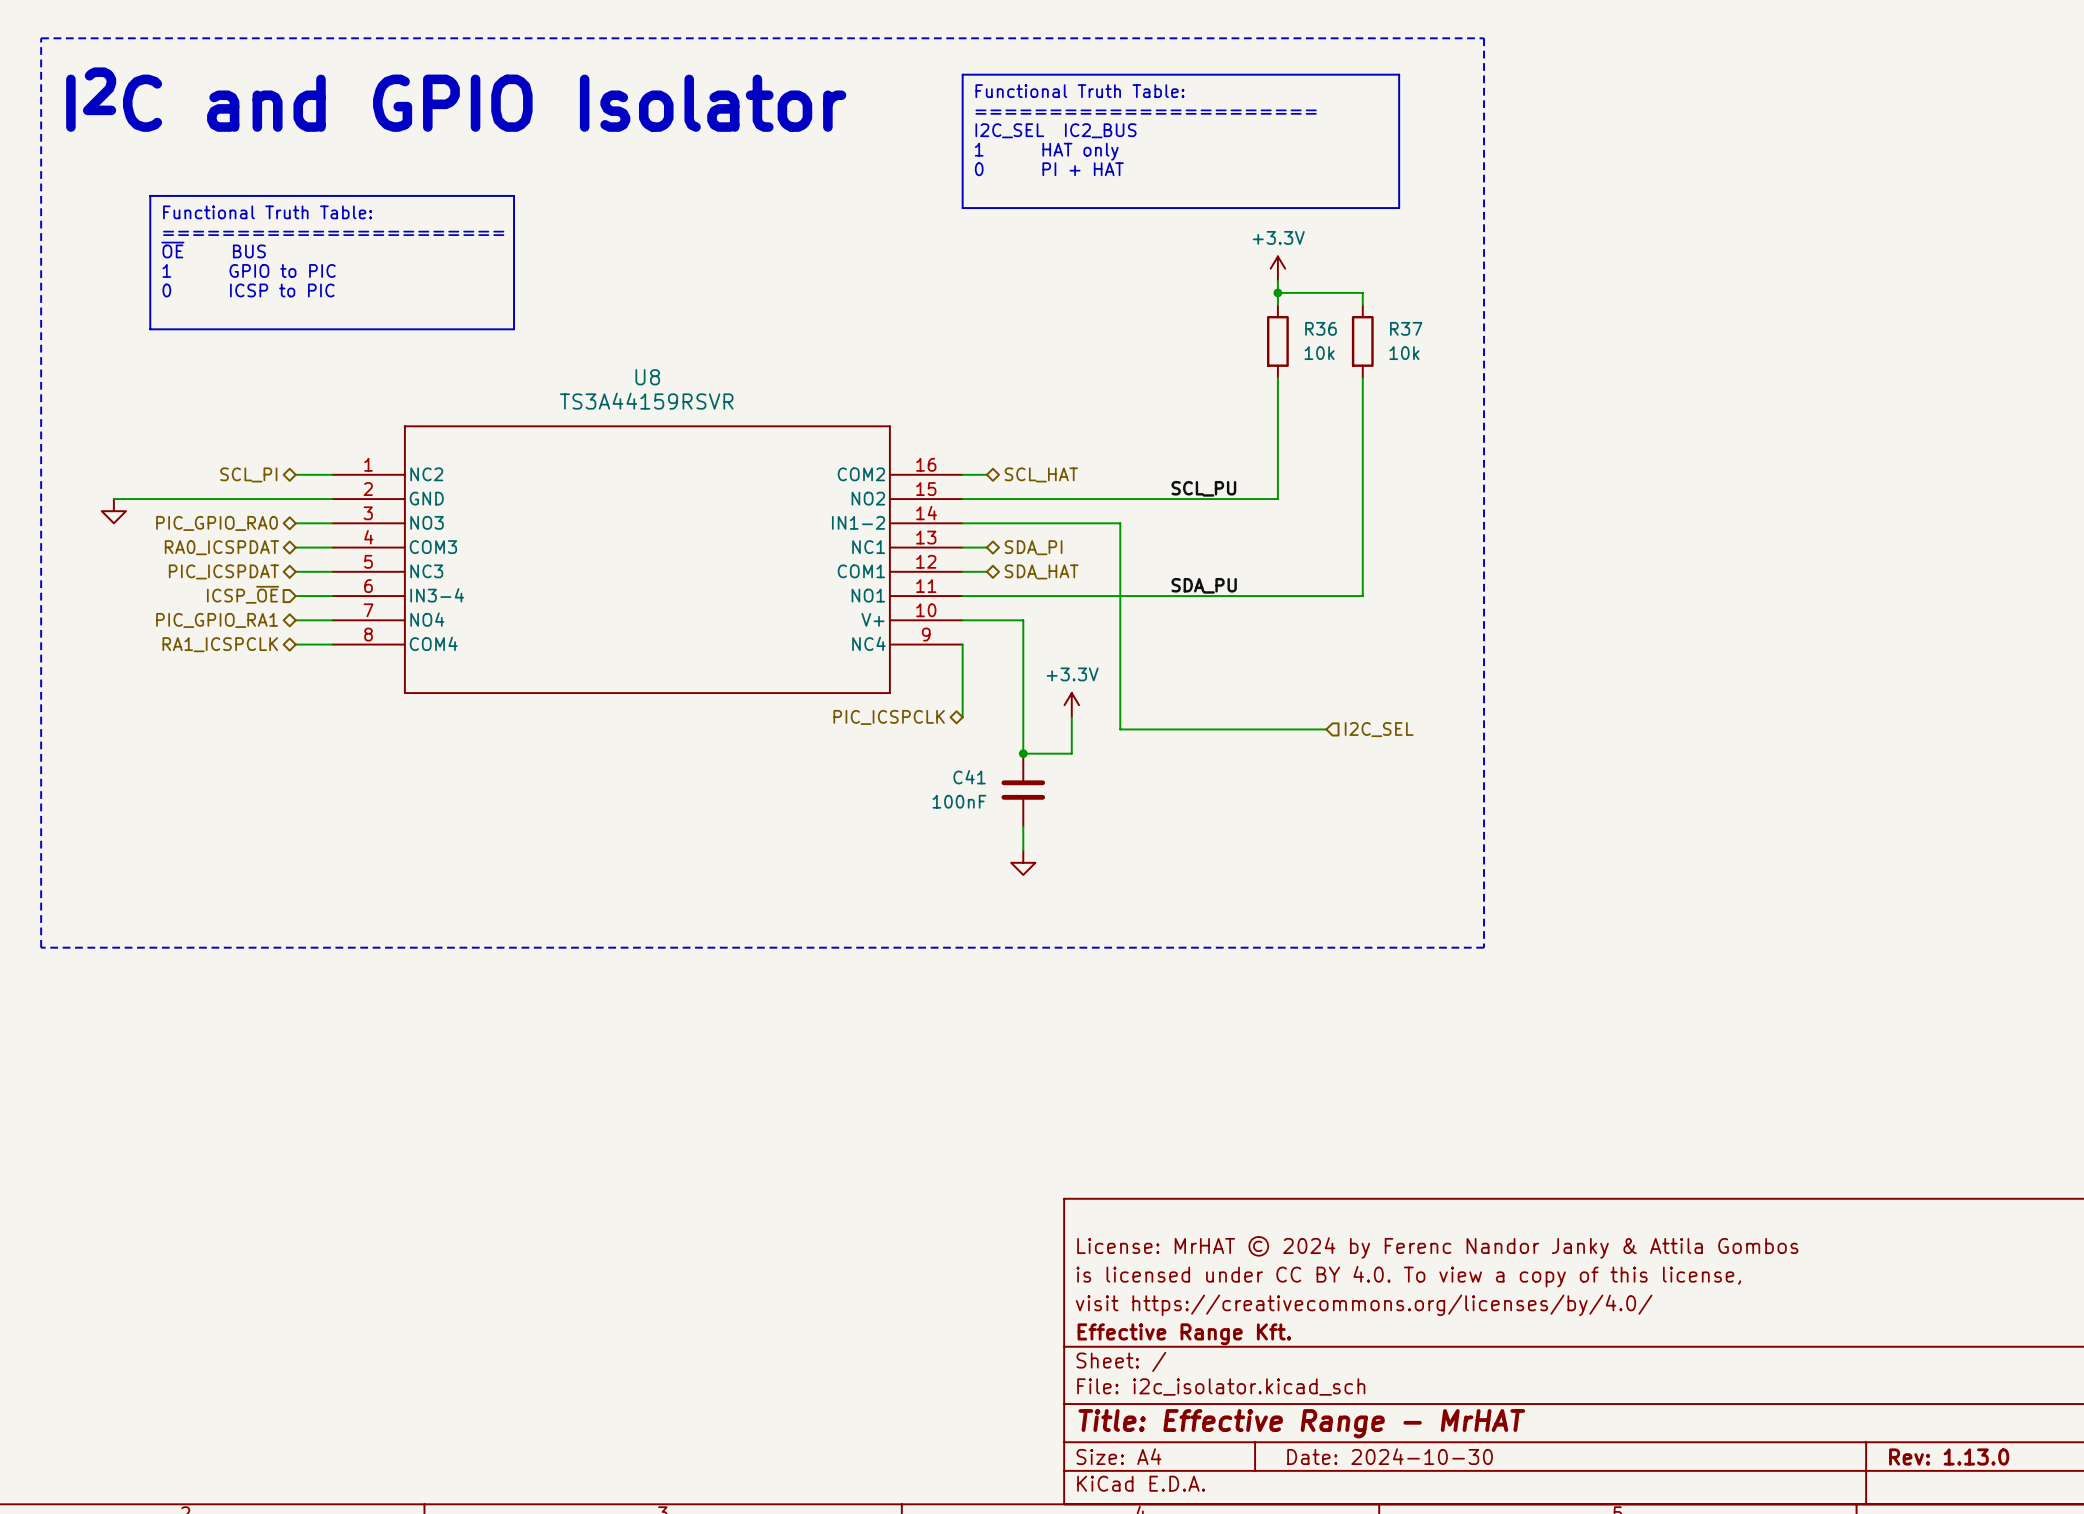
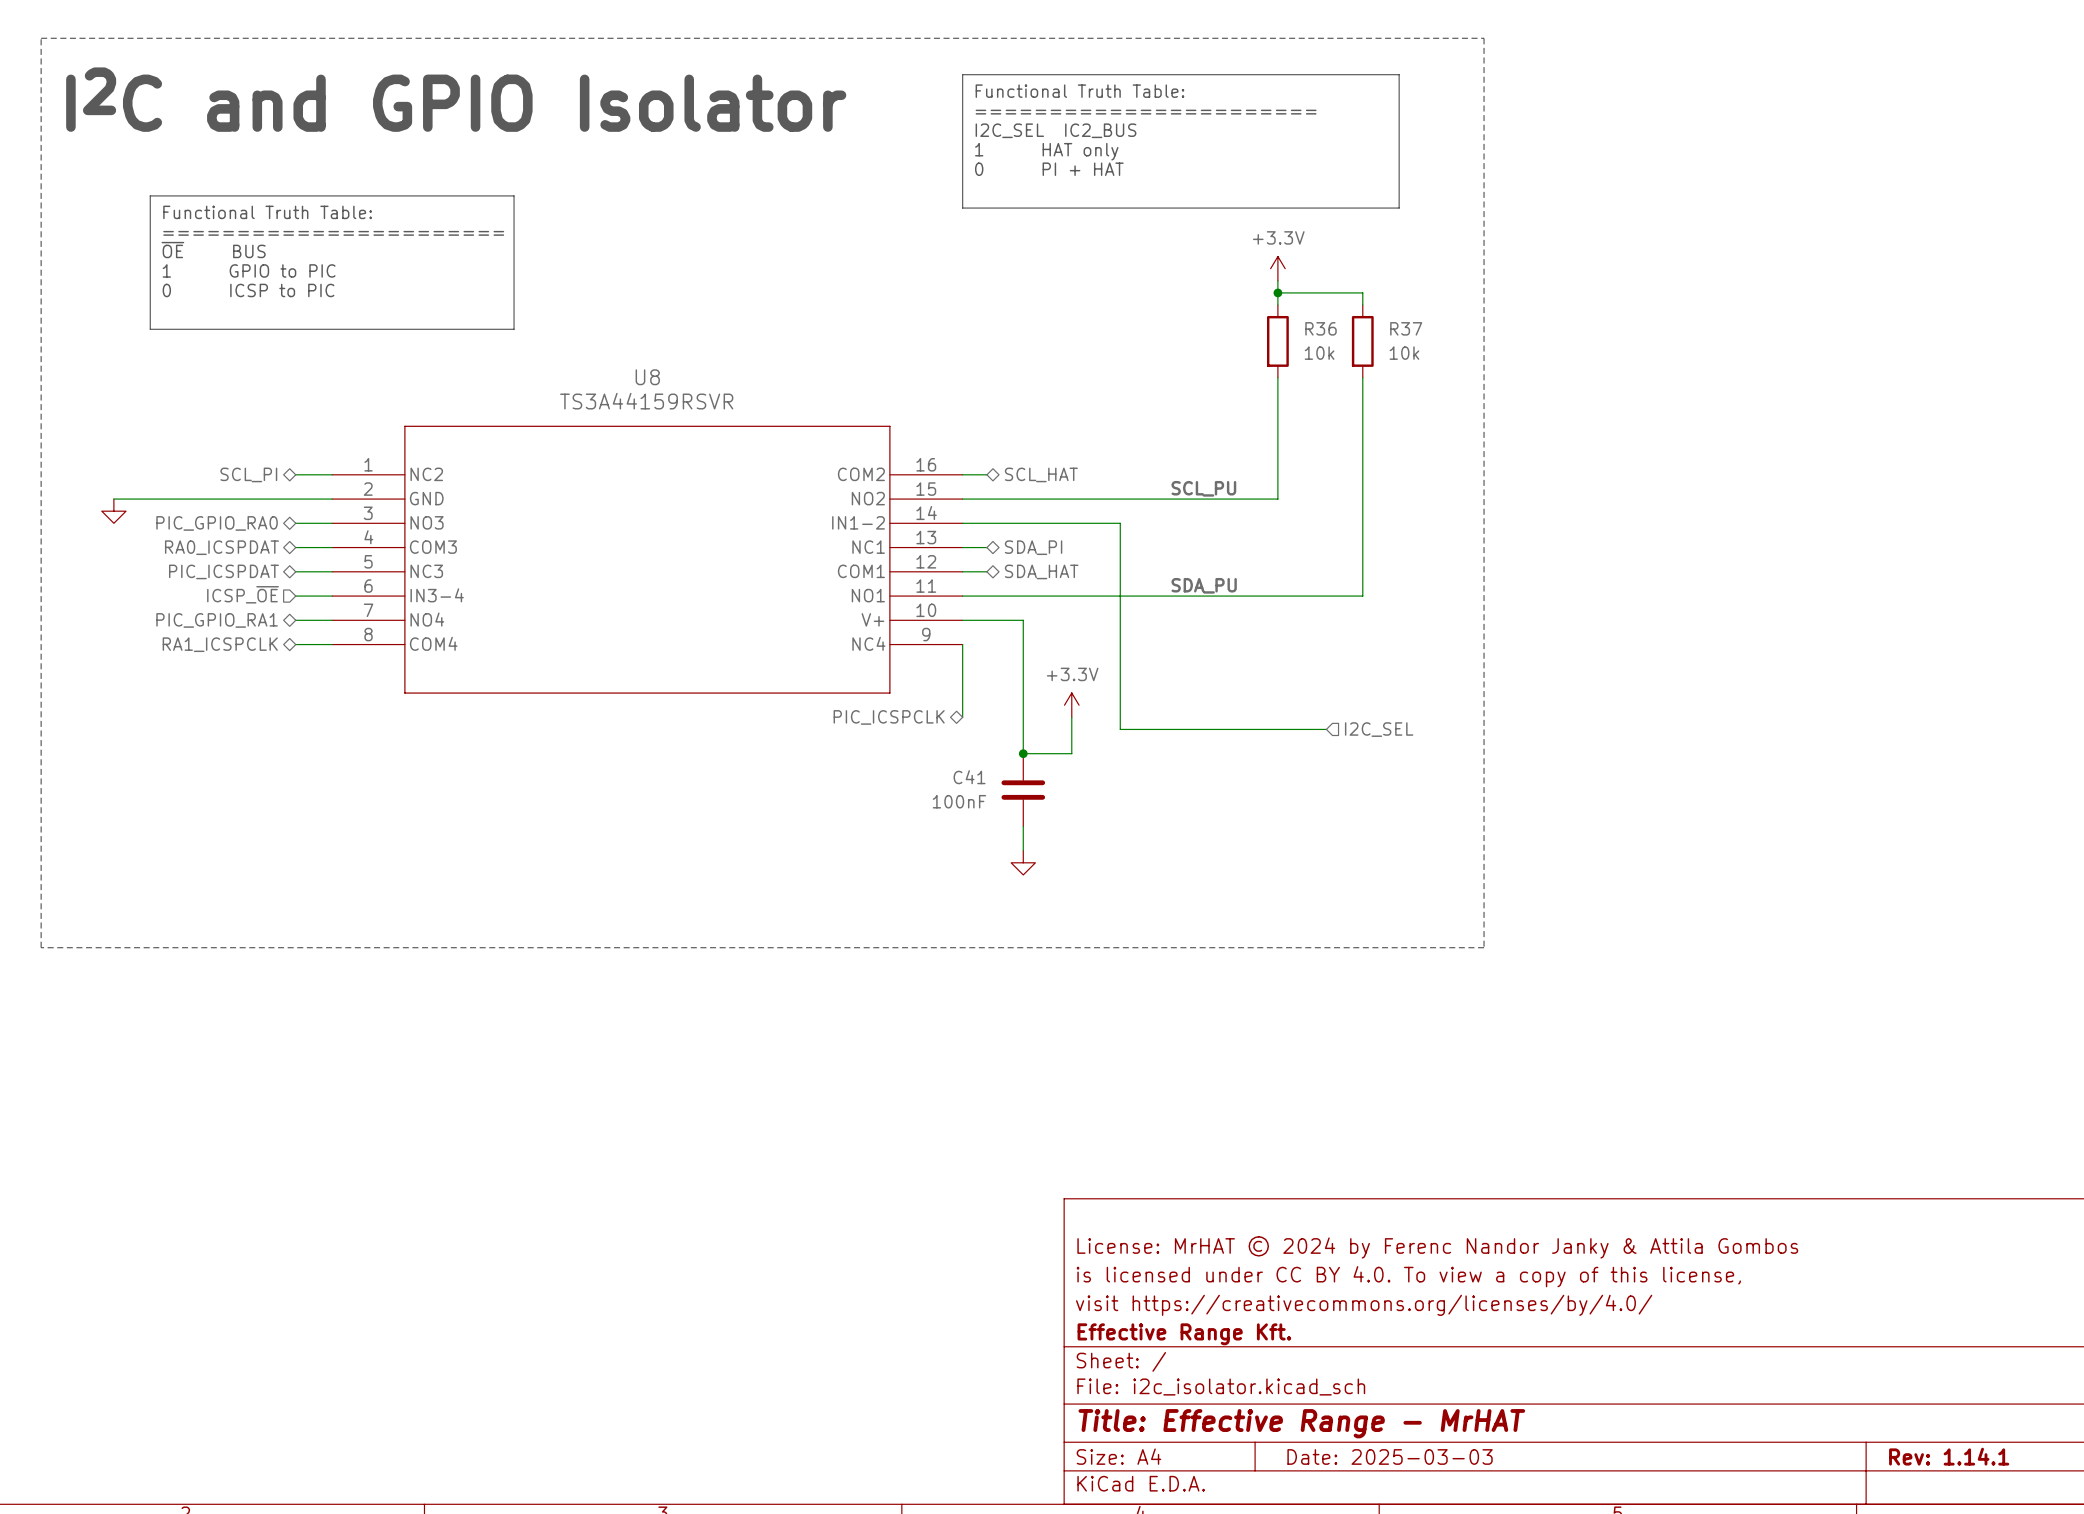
title block: Date: 2024-10-30 (1390, 1456) -> Date: 2025-03-03 (1390, 1456)
title block: Rev: 1.13.0 (1949, 1456) -> Rev: 1.14.1 (1949, 1456)

